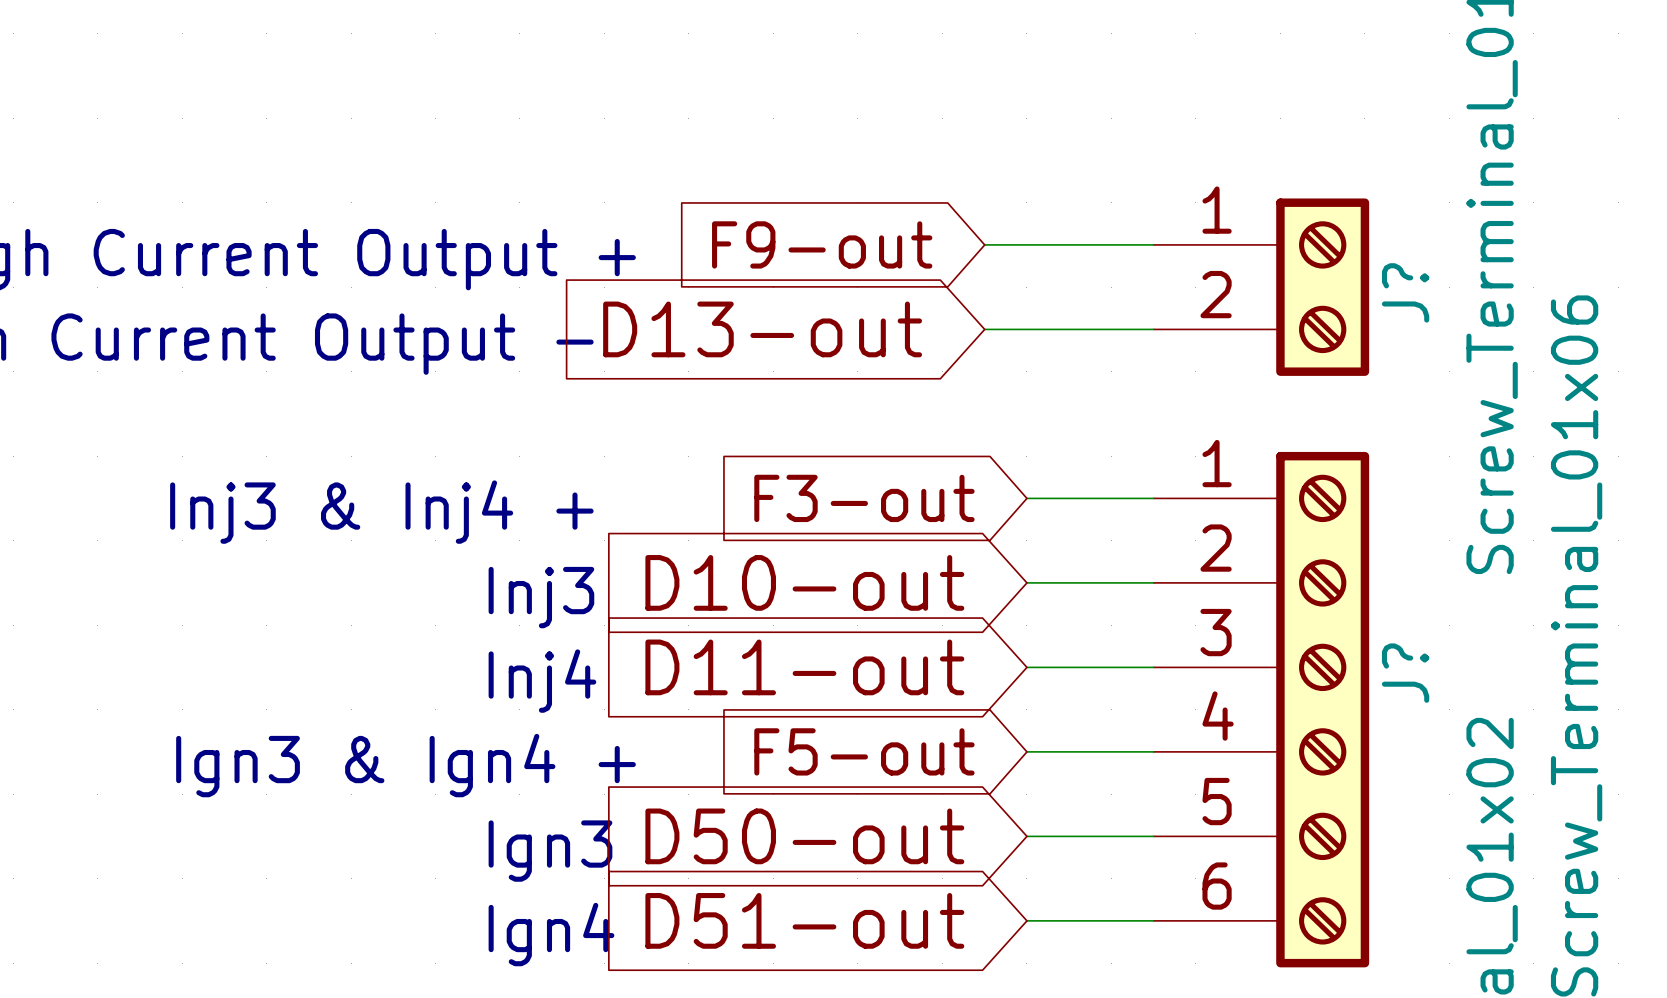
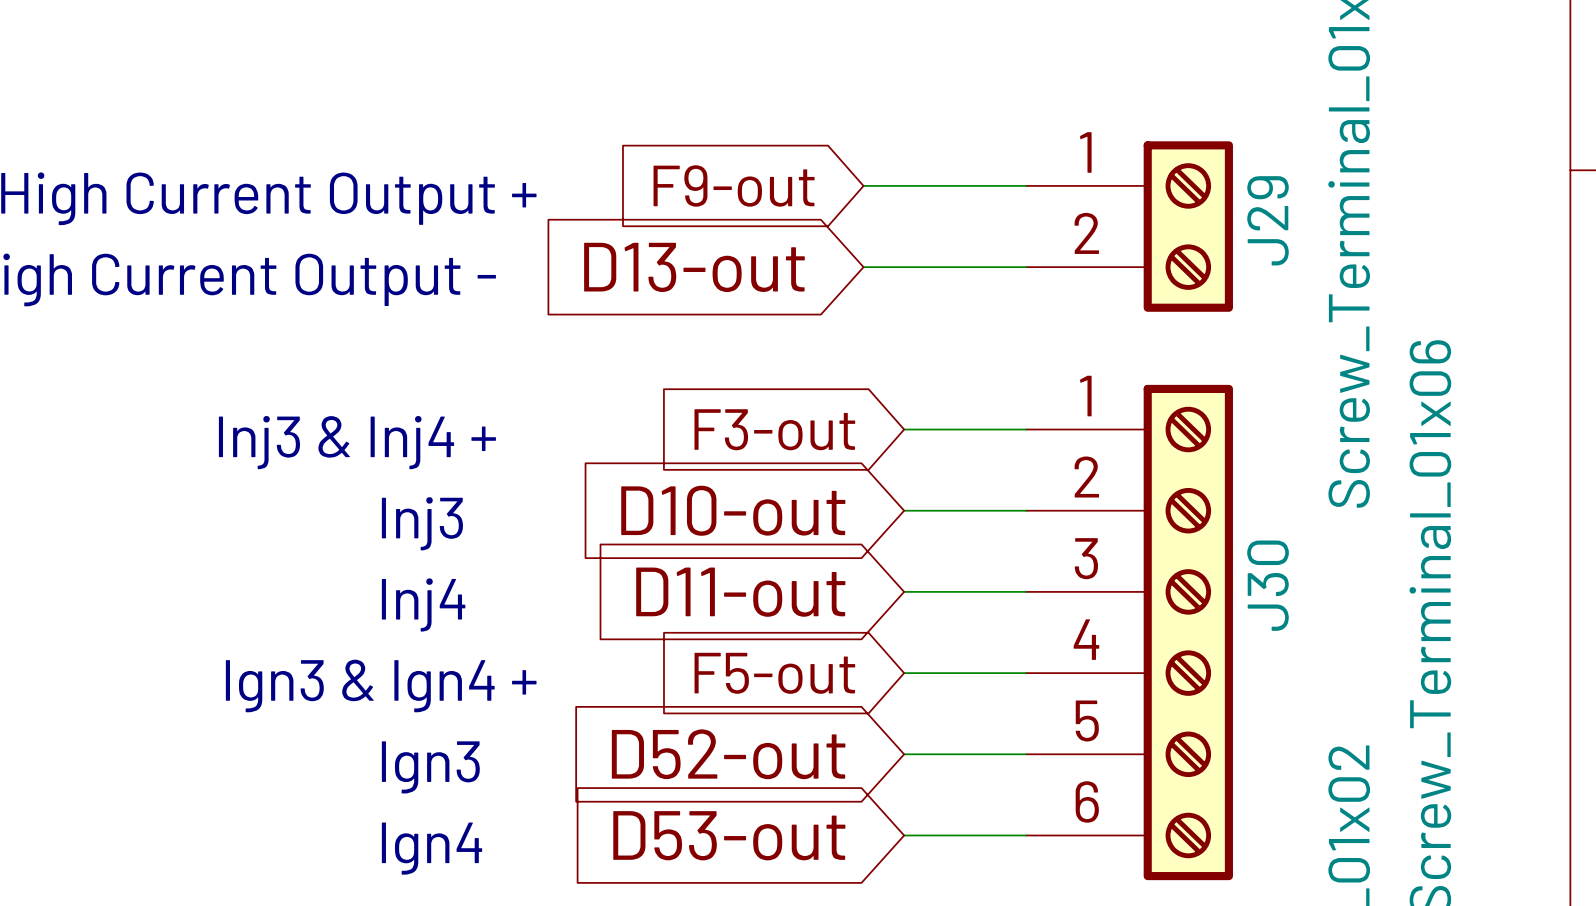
J? name: J? (1405, 292) -> J29 (1268, 220)
J? name: J? (1405, 673) -> J30 (1268, 585)
global label: D50-out (804, 836) -> D52-out (728, 754)
global label: D51-out (804, 920) -> D53-out (729, 835)

